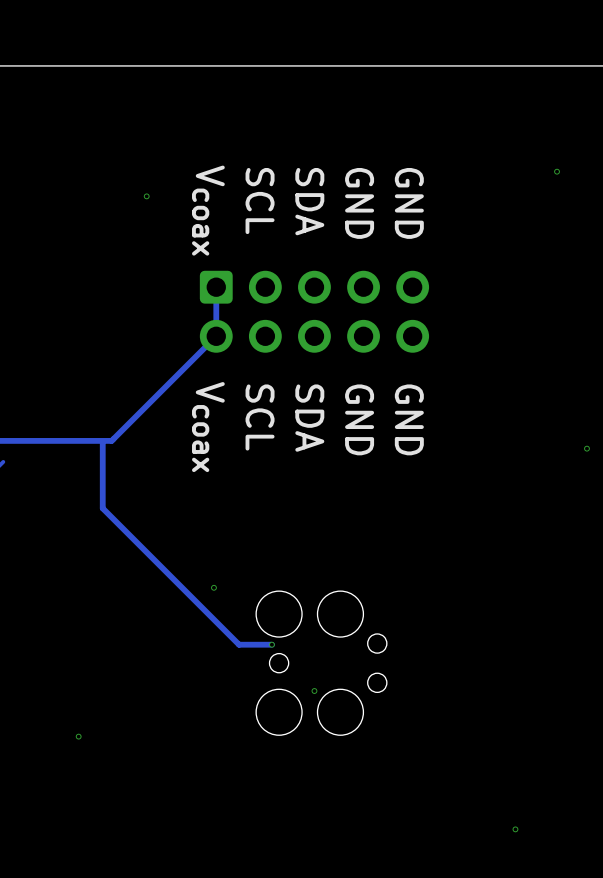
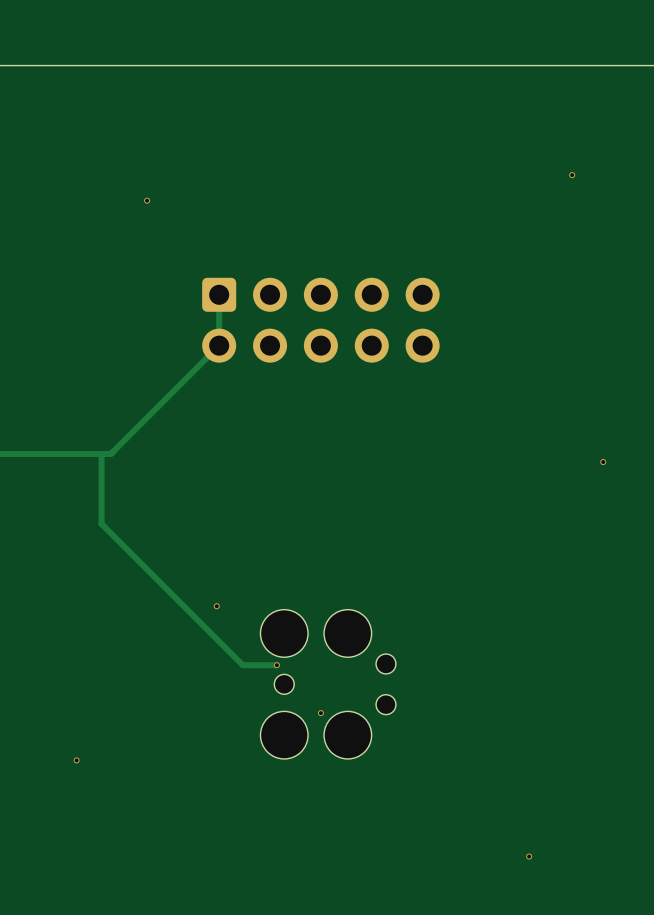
text: SCL (260, 201) -> none
text: SDA (309, 201) -> none
text: GND (359, 203) -> none
text: GND (409, 203) -> none
text: Vcoax (208, 210) -> none
text: SCL (260, 417) -> none
text: SDA (309, 418) -> none
text: GND (359, 419) -> none
text: GND (409, 419) -> none
text: Vcoax (208, 427) -> none

